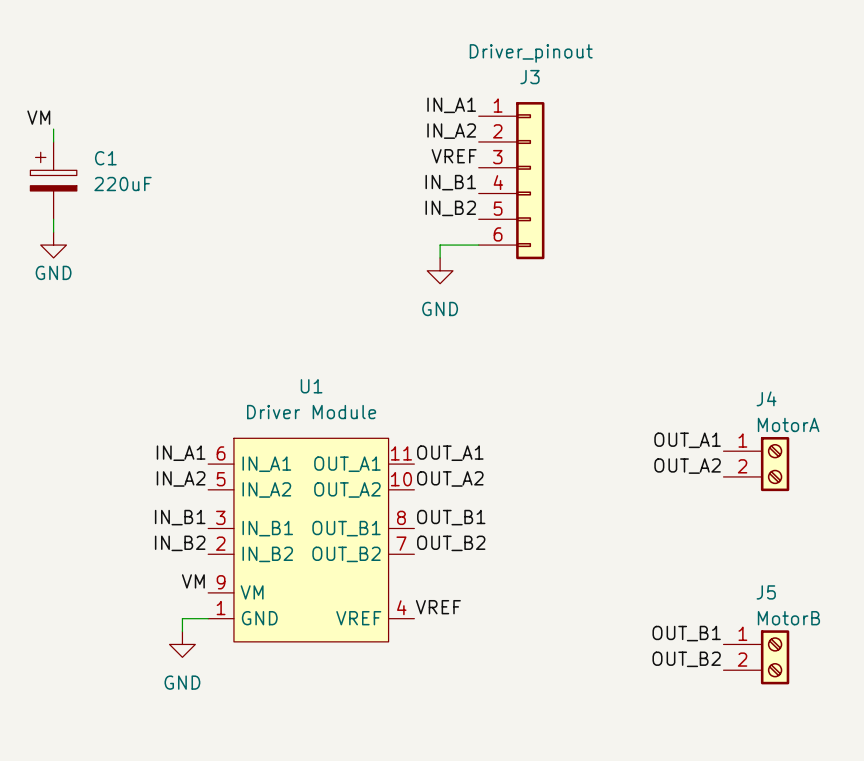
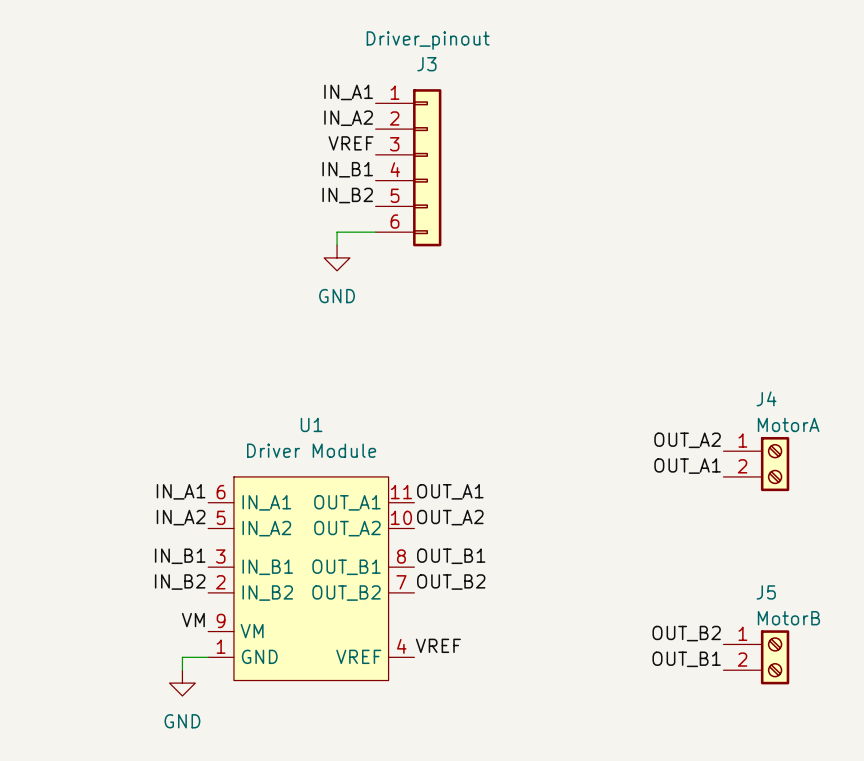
label position: IN_A1 (451, 105) -> IN_A1 (348, 92)
label: VM (38, 117) -> none
wire: (53, 129) (53, 141) -> none
label position: IN_A2 (451, 131) -> IN_A2 (348, 118)
label position: VREF (454, 156) -> VREF (351, 143)
C1: 220uF (53, 180) -> none
J3 position: (511, 180) -> (408, 167)
label position: IN_B1 (450, 182) -> IN_B1 (347, 169)
label position: IN_B2 (450, 208) -> IN_B2 (347, 195)
wire: (53, 219) (53, 232) -> none
power symbol: GND (53, 245) -> none
wire: (478, 245) (440, 245) (440, 257) -> (375, 232) (337, 232) (337, 245)
power symbol position: GND (440, 270) -> GND (337, 257)
label: OUT_A1 (687, 440) -> OUT_A2 (687, 440)
label position: IN_A1 (181, 453) -> IN_A1 (181, 491)
label position: OUT_A1 (450, 453) -> OUT_A1 (450, 491)
label: OUT_A2 (687, 466) -> OUT_A1 (687, 466)
label: IN_A2 (181, 478) -> none
label: OUT_A2 (450, 478) -> none
label: IN_B1 (180, 517) -> IN_A2 (181, 517)
label: OUT_B1 (451, 517) -> OUT_A2 (450, 517)
U1 position: (311, 540) -> (311, 578)
label: IN_B2 (180, 543) -> IN_B1 (180, 556)
label position: OUT_B2 (451, 543) -> OUT_B2 (451, 582)
label: none -> OUT_B1 (451, 556)
label: VM (193, 581) -> IN_B2 (180, 582)
label position: VREF (438, 607) -> VREF (438, 645)
wire: (208, 618) (182, 618) (182, 631) -> (208, 657) (182, 657) (182, 670)
label: none -> VM (193, 620)
label: OUT_B1 (686, 633) -> OUT_B2 (686, 633)
power symbol position: GND (182, 644) -> GND (182, 683)
label: OUT_B2 (686, 659) -> OUT_B1 (686, 659)

